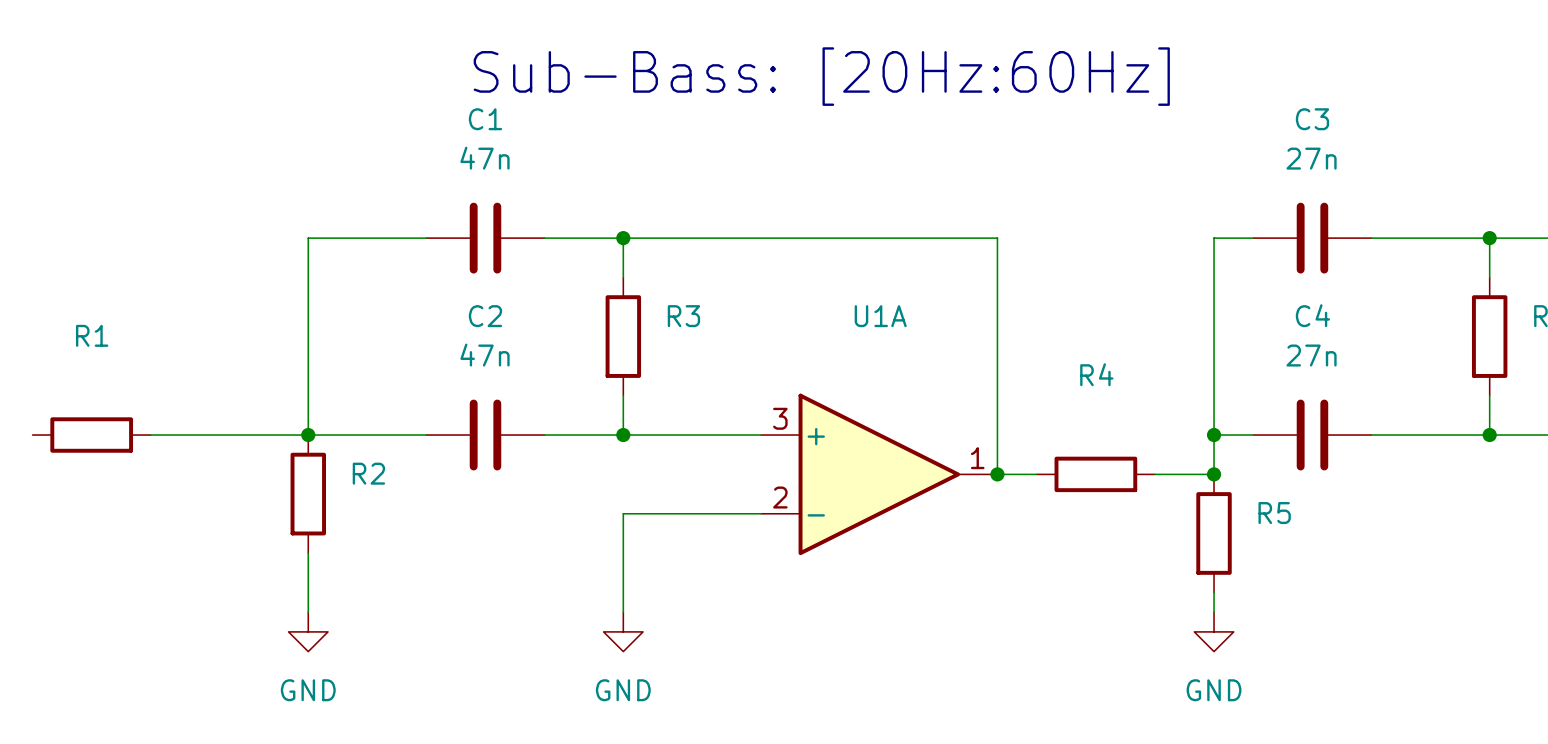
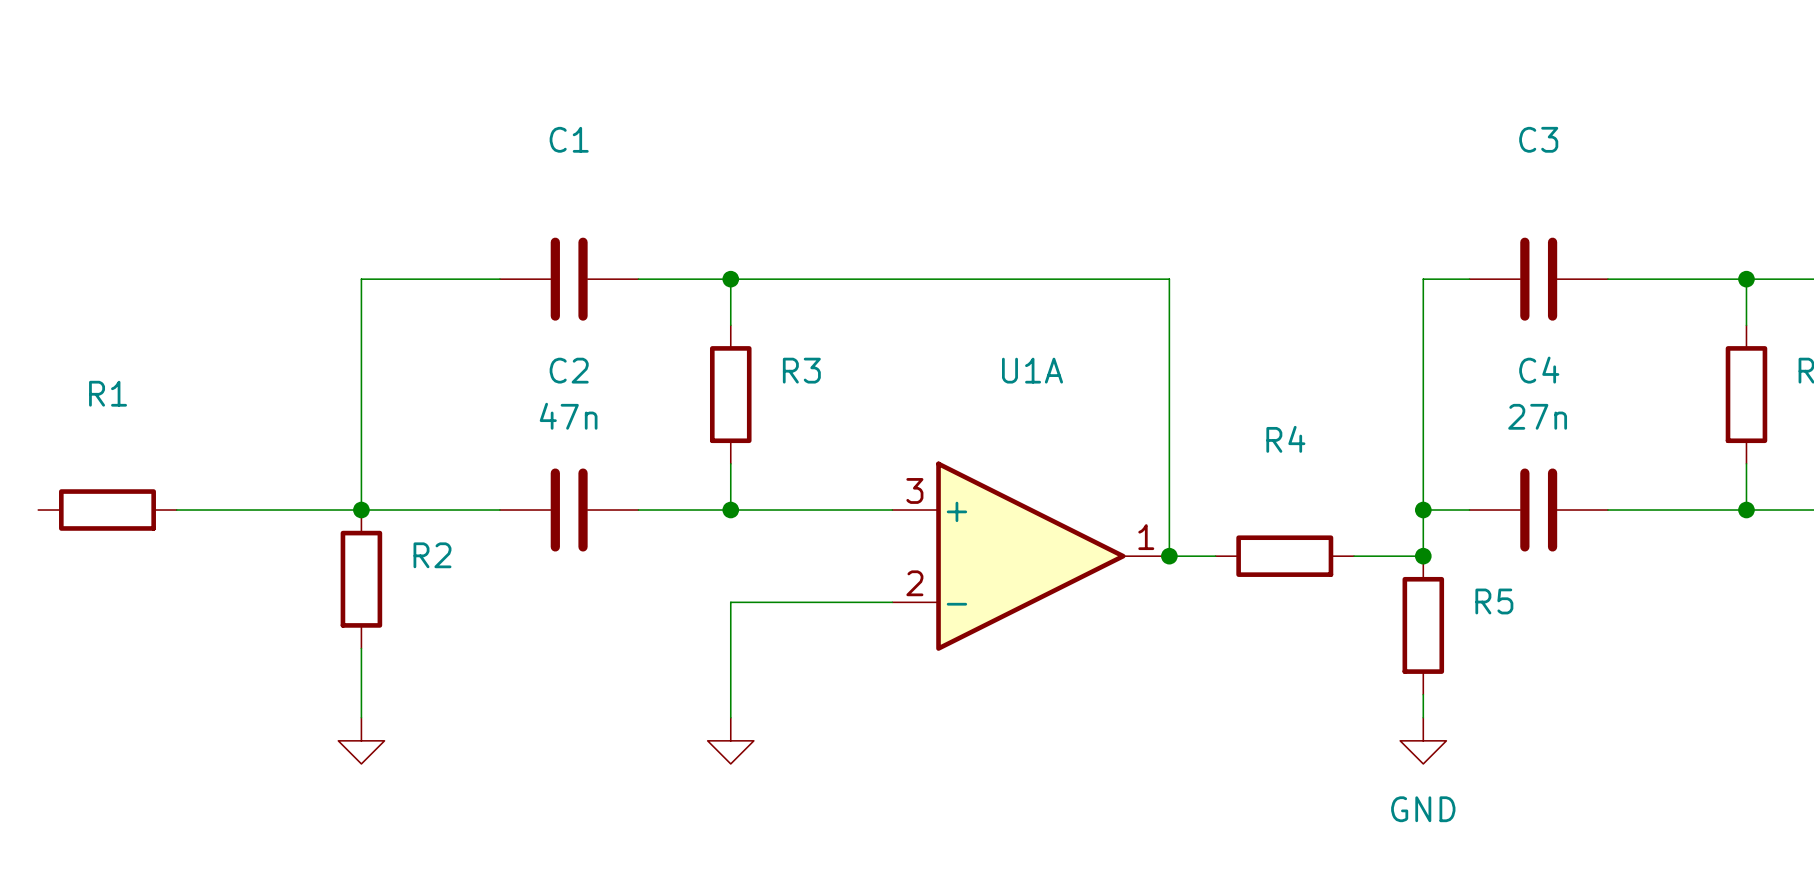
text: Sub-Bass: [20Hz:60Hz] (821, 76) -> none
C1 value: 47n (485, 158) -> none
C3 value: 27n (1311, 158) -> none
power symbol text: GND (308, 690) -> none
power symbol text: GND (623, 690) -> none

